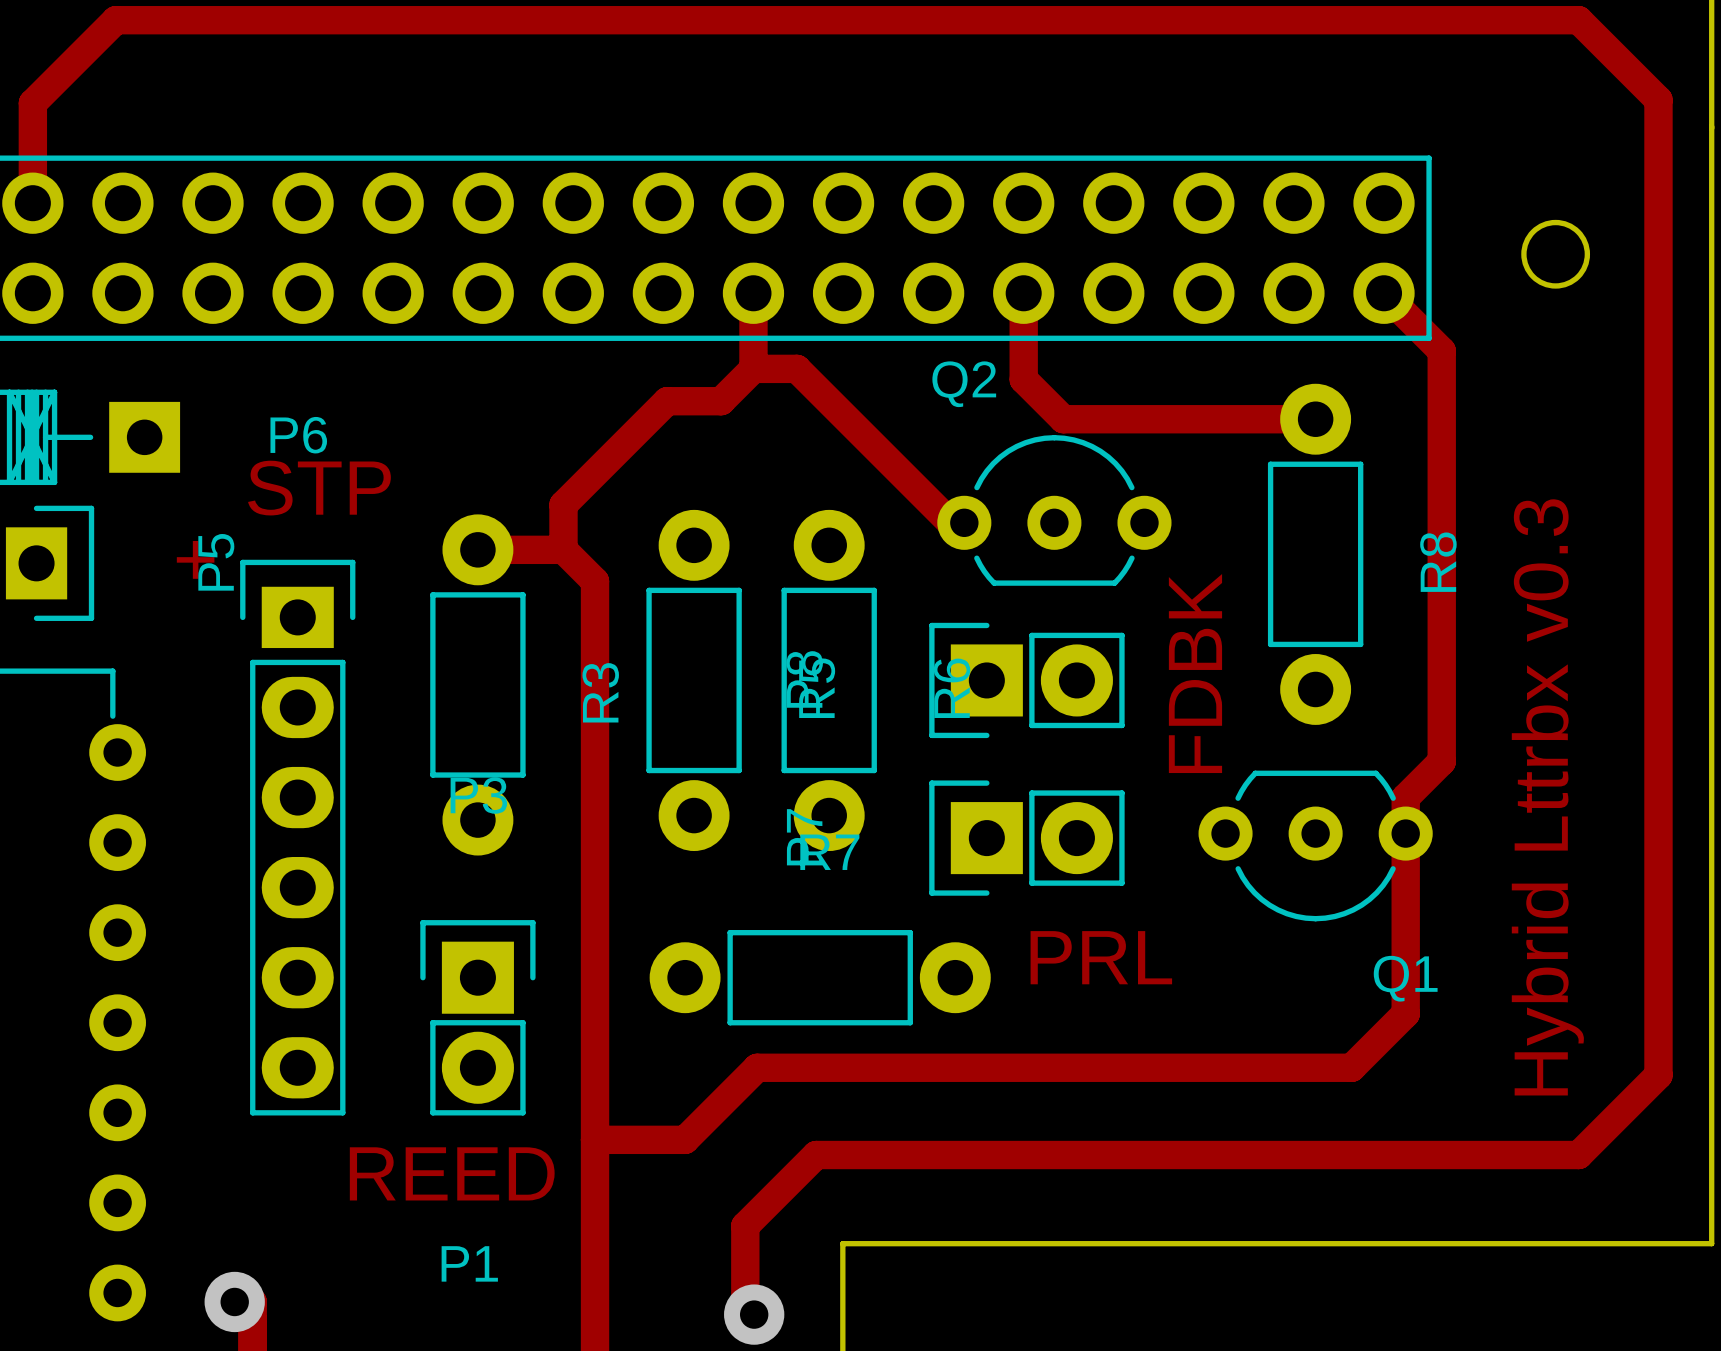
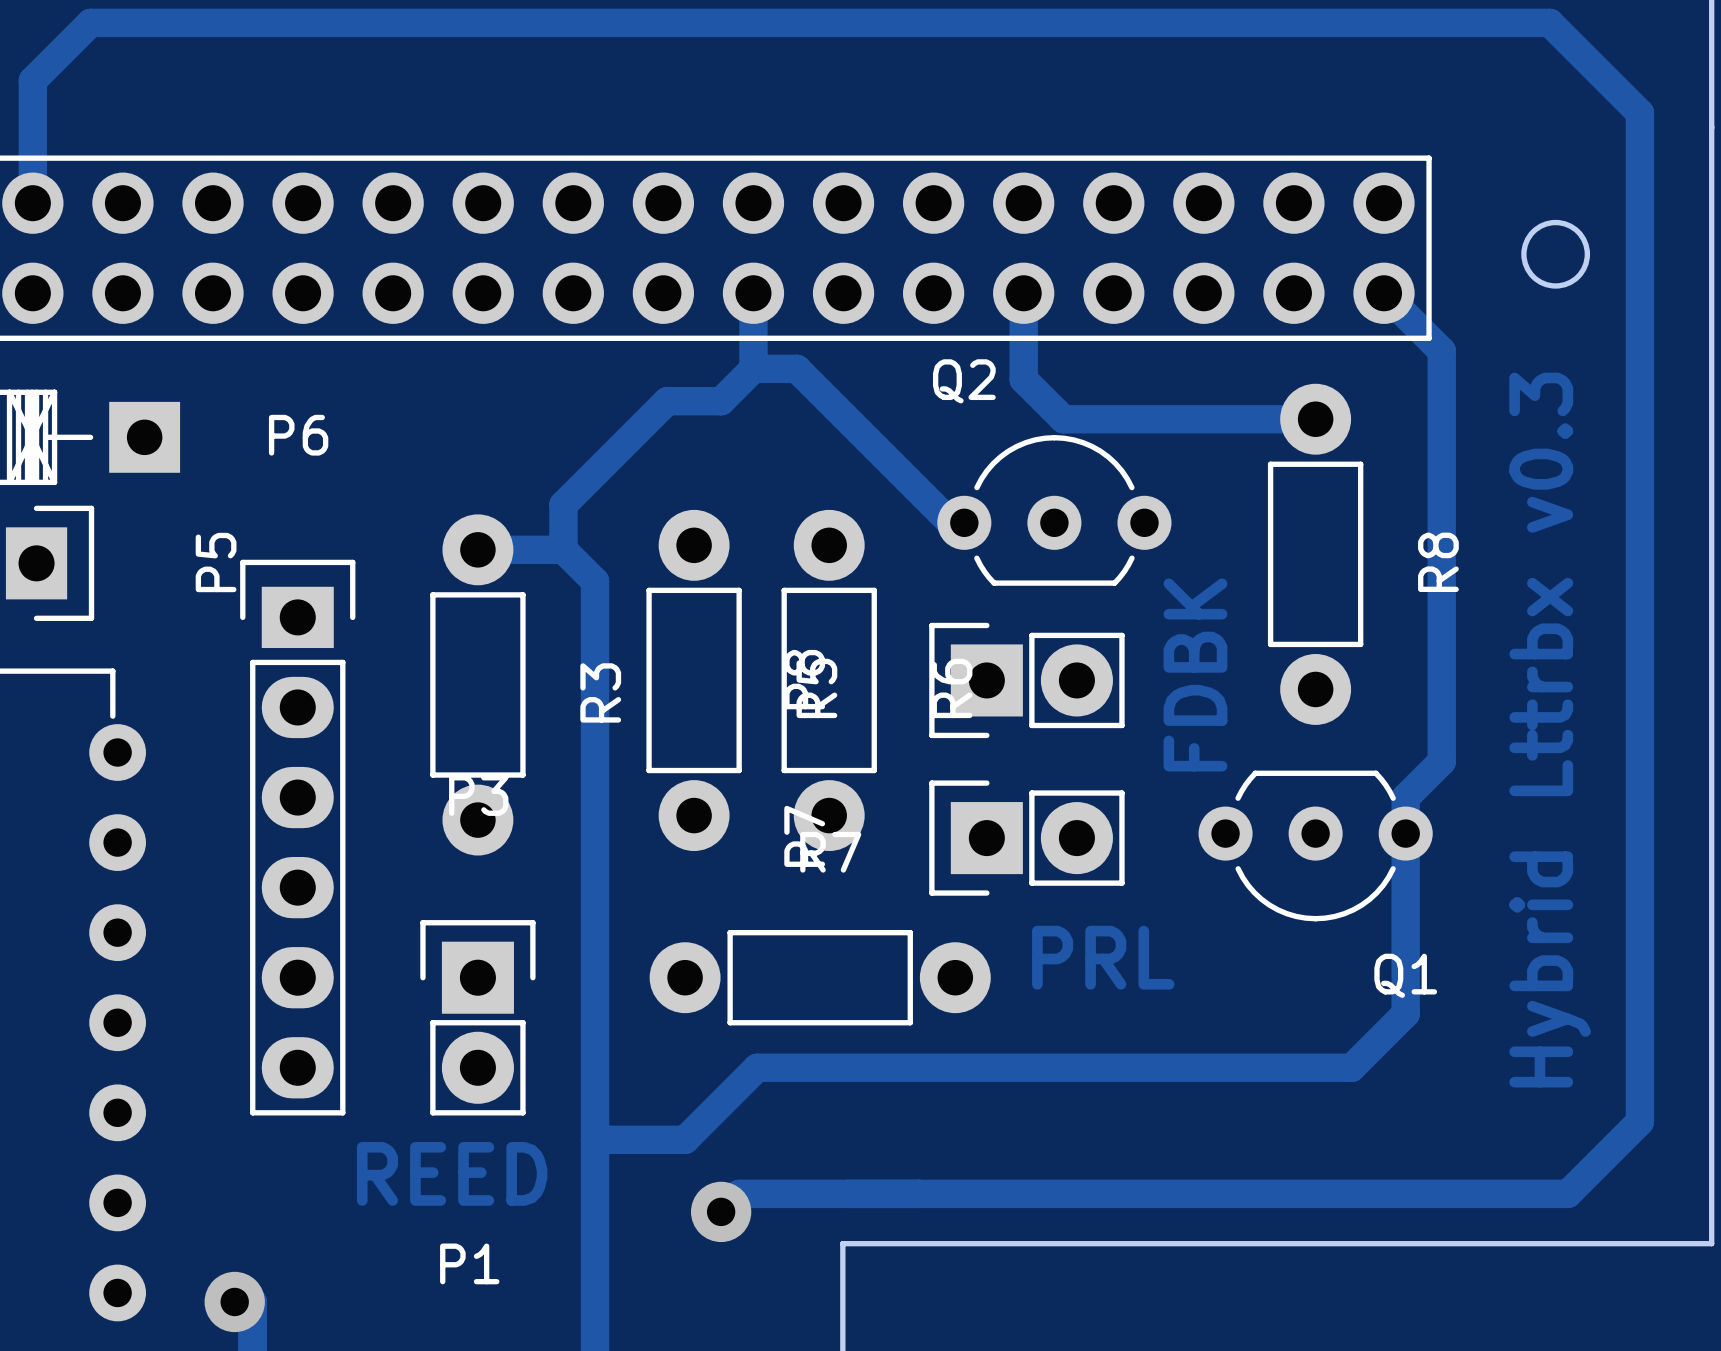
track: (32, 103) (115, 20) (1578, 20) (1658, 99) (1658, 1075) (1578, 1155) (816, 1155) (745, 1225) (745, 1305) (754, 1314) -> (32, 103) (32, 80) (90, 22) (1549, 22) (1639, 112) (1639, 1121) (1567, 1193) (739, 1193) (721, 1211)
text: STP (319, 488) -> none
text: + (195, 559) -> none
via position: (754, 1314) -> (721, 1211)

